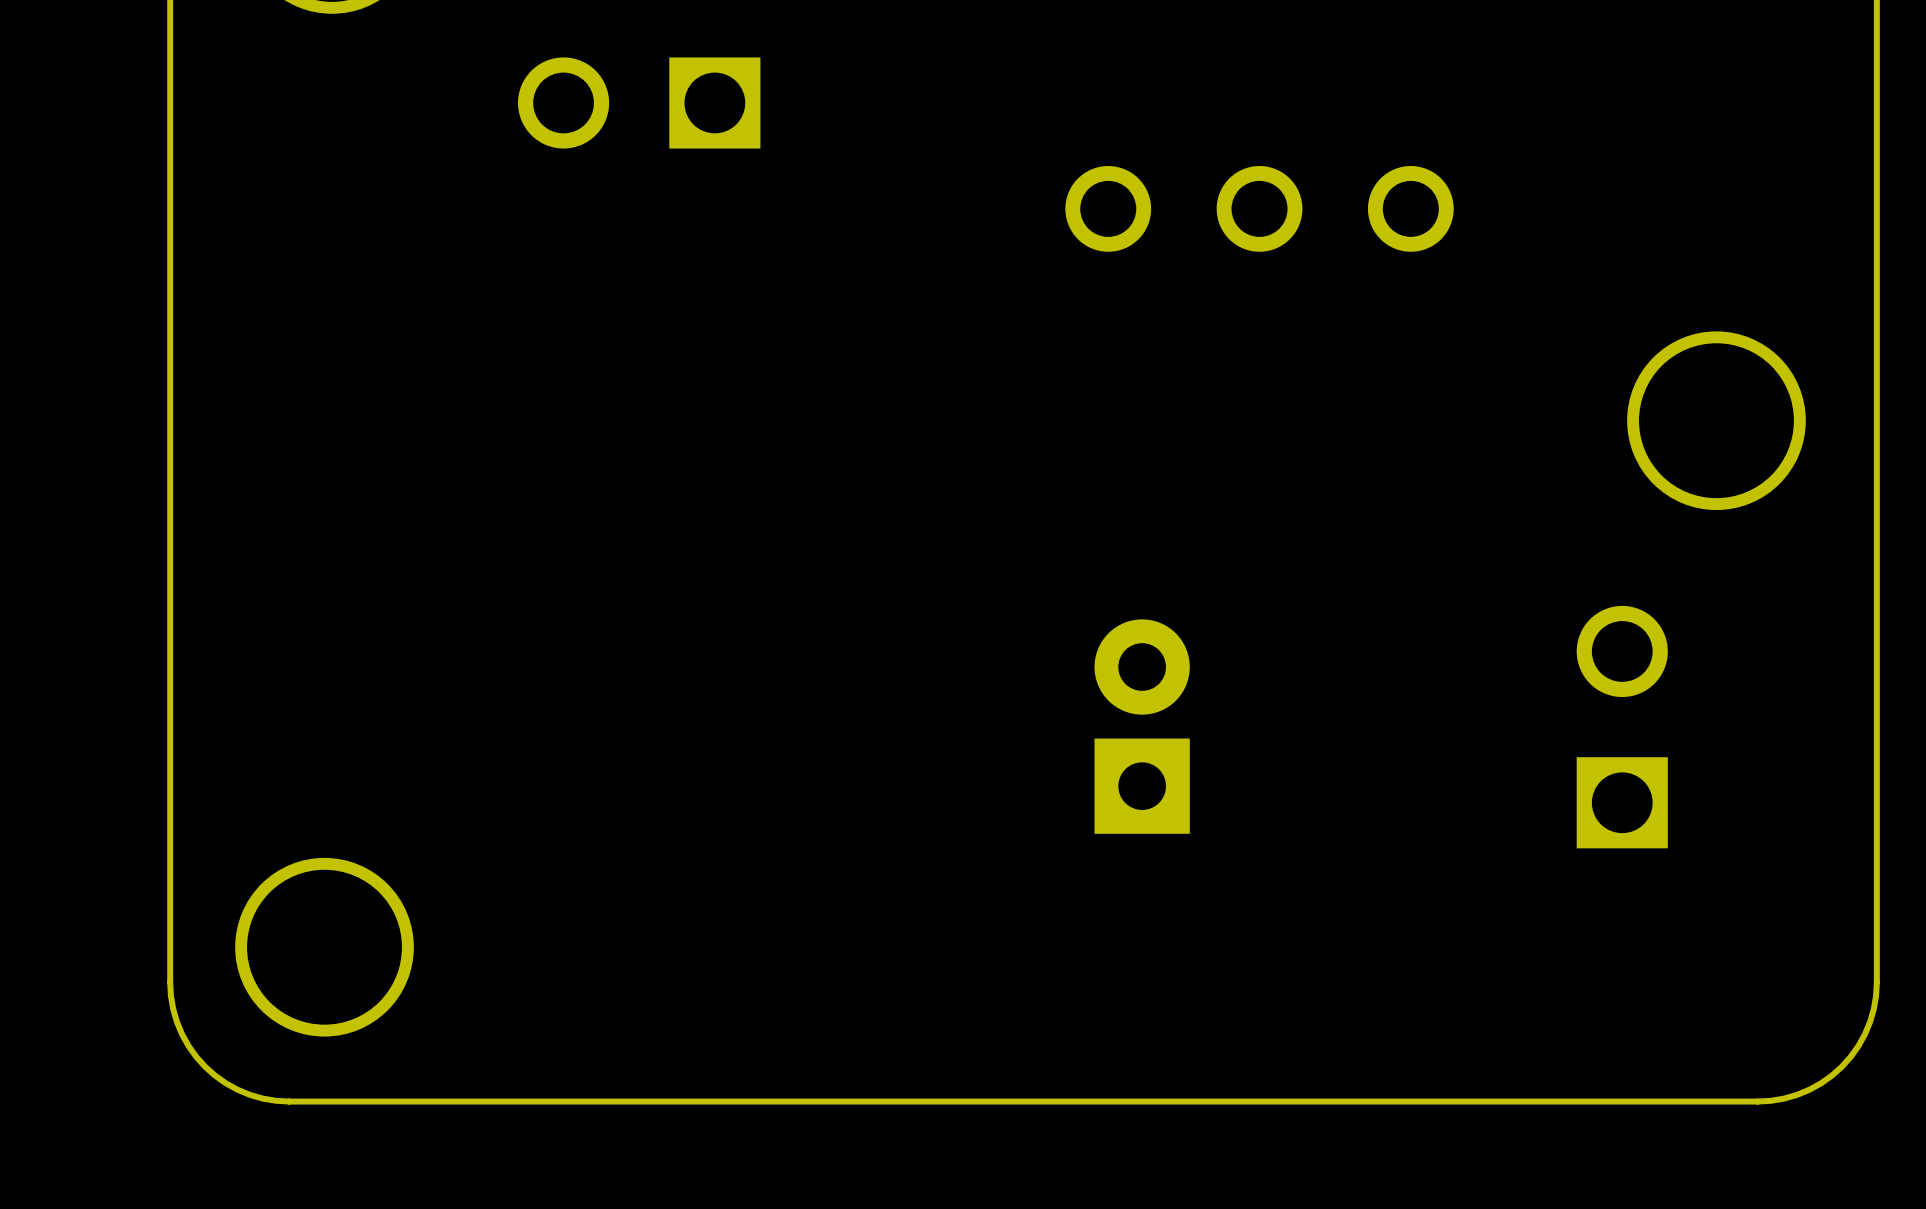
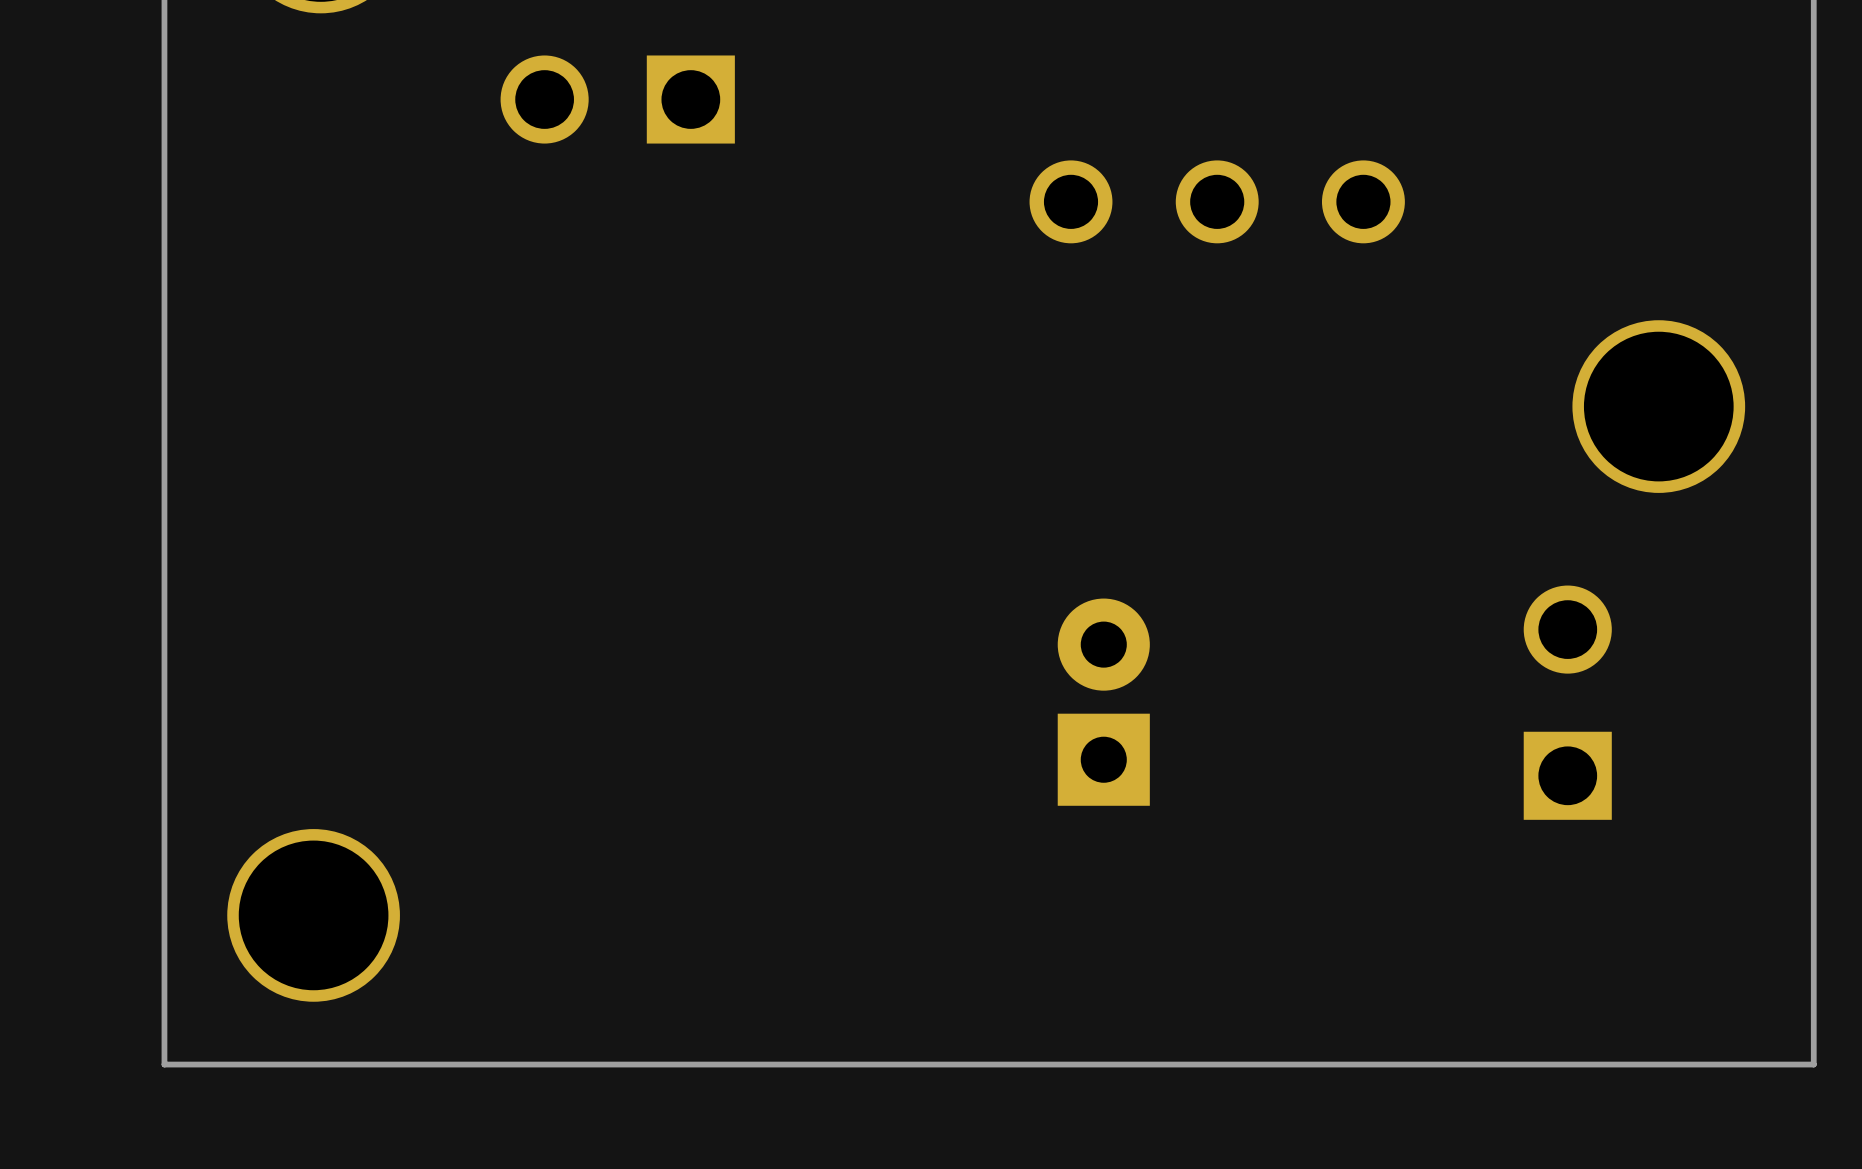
board edge: (170, 982) (176, 1021) (188, 1045) (205, 1066) (237, 1089) (262, 1098) (289, 1101) -> (164, 949) (164, 1064) (279, 1064)
board edge: (1876, 982) (1870, 1021) (1858, 1045) (1841, 1066) (1821, 1083) (1797, 1094) (1757, 1101) -> (1813, 949) (1813, 1064) (1698, 1064)

